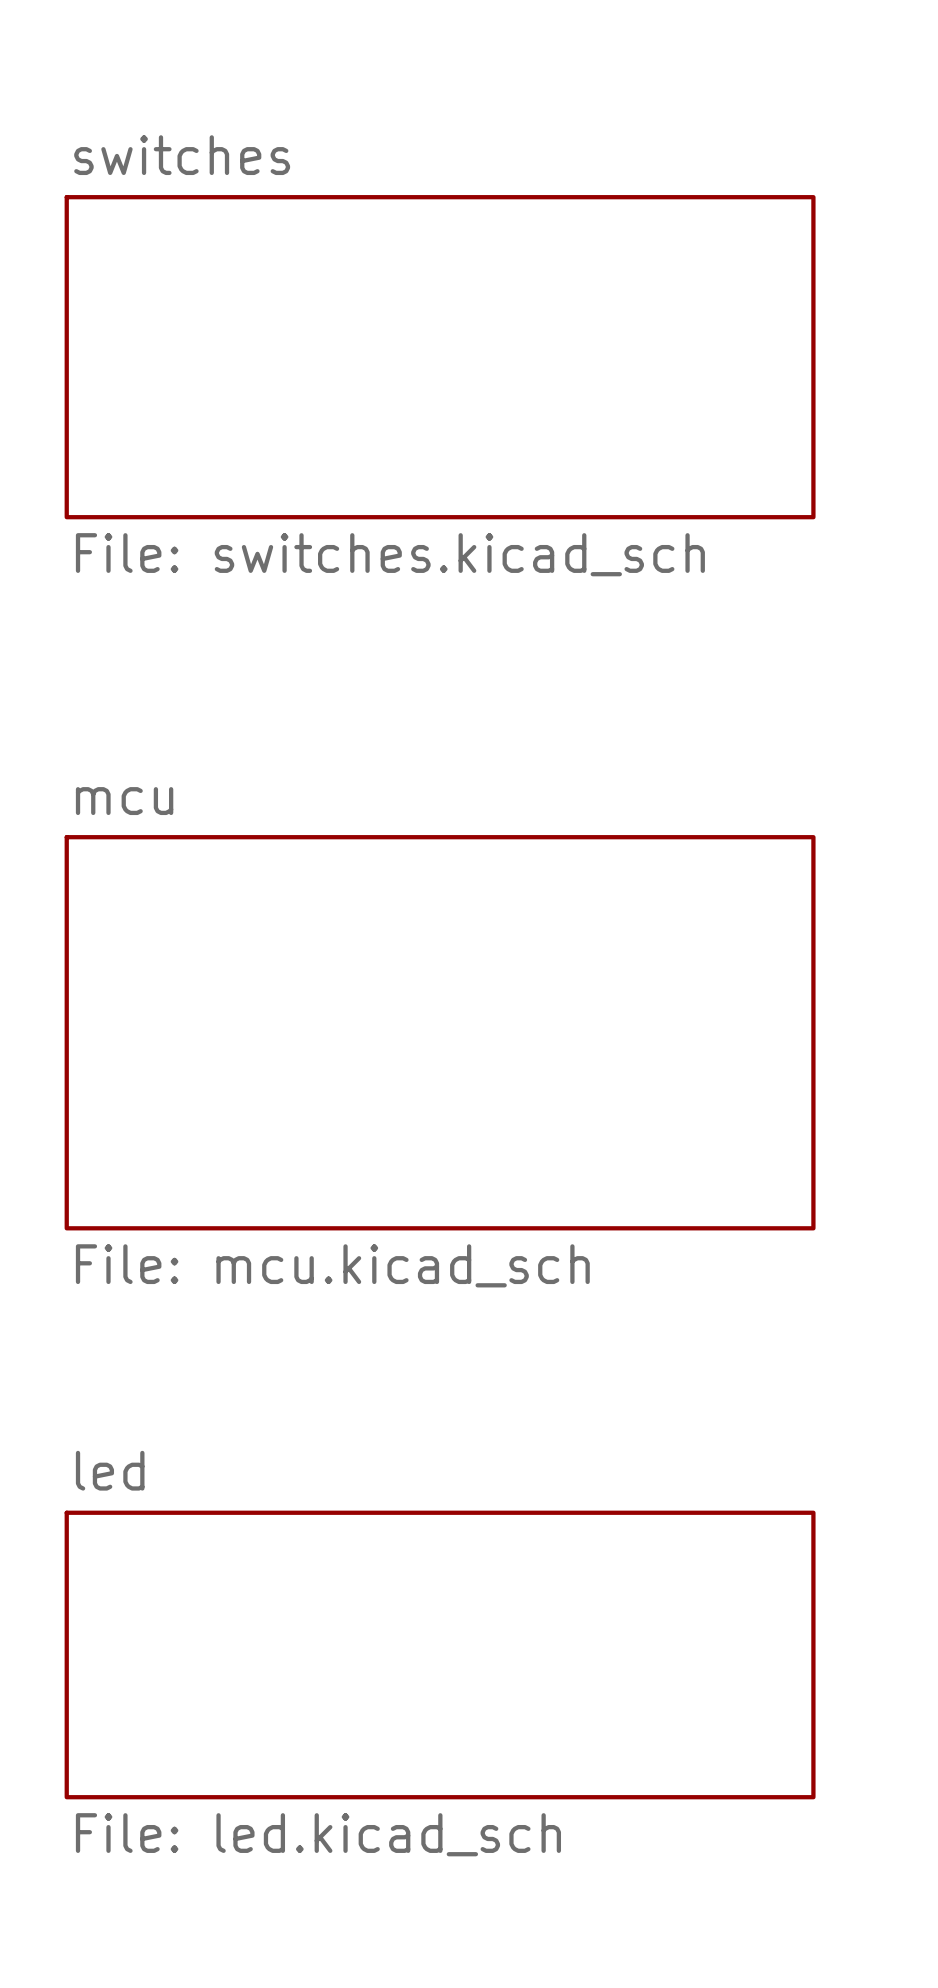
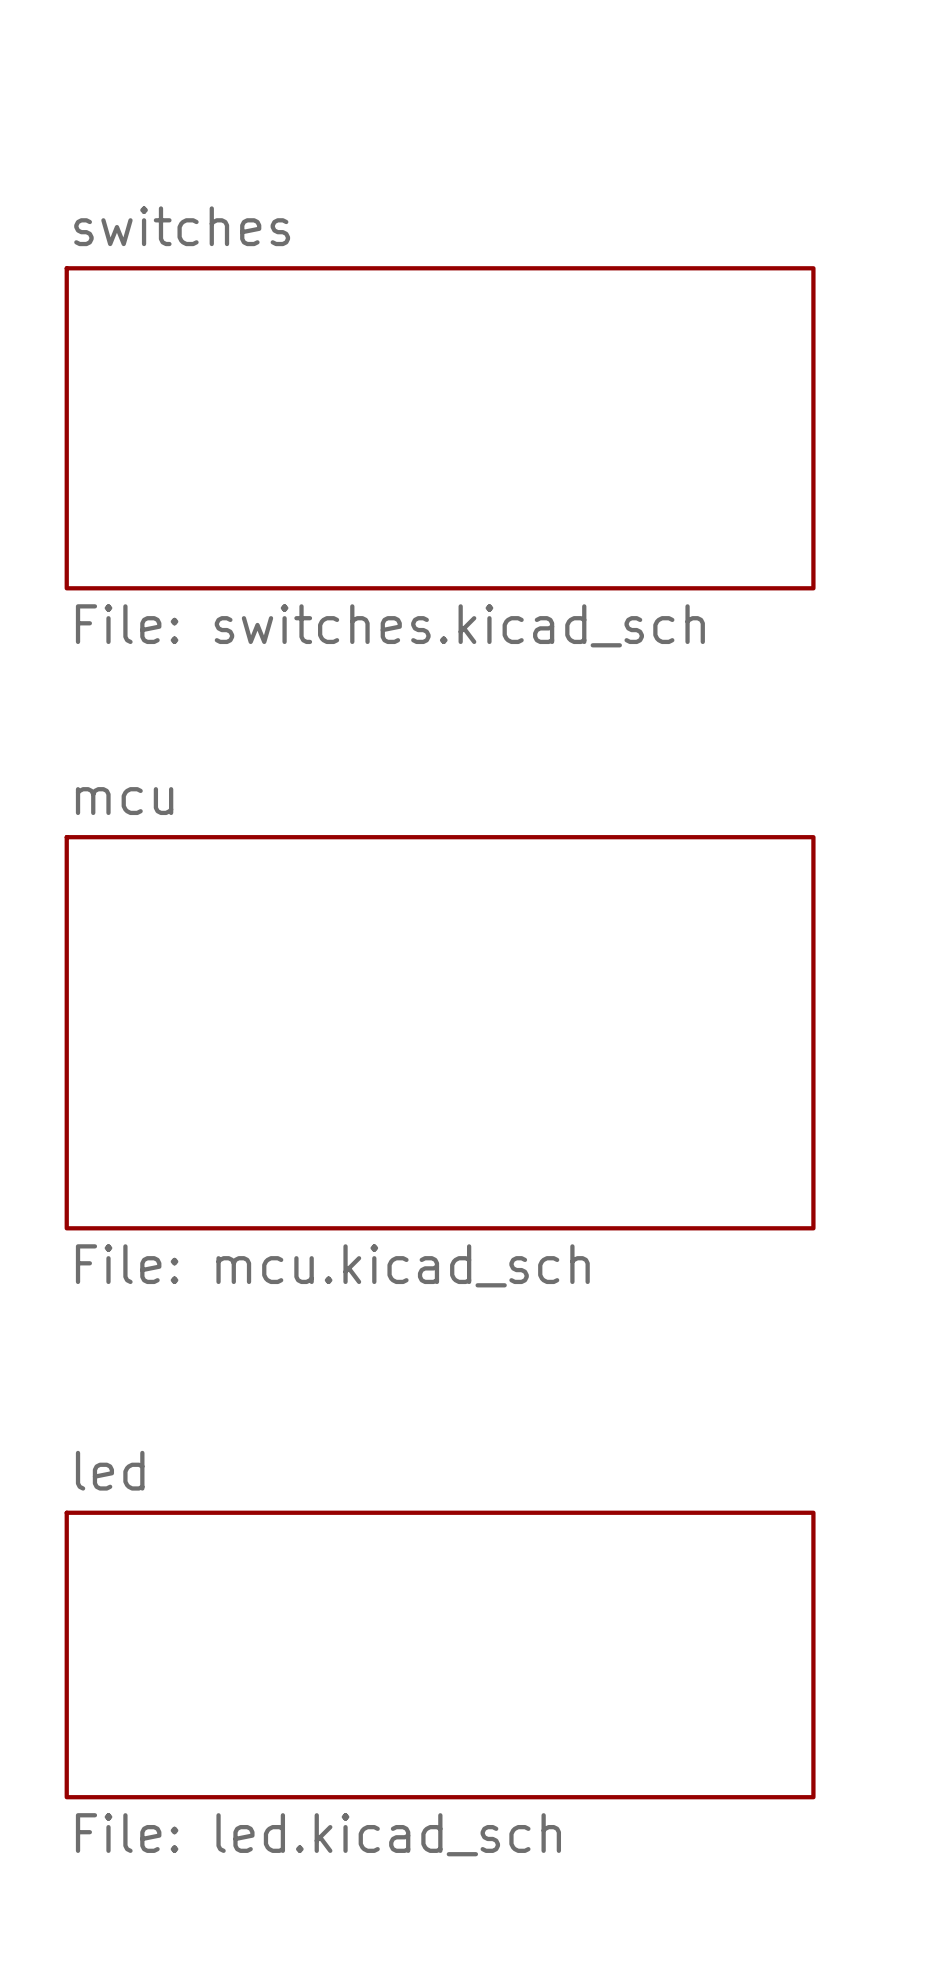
sheet switches position: (440, 357) -> (440, 428)

